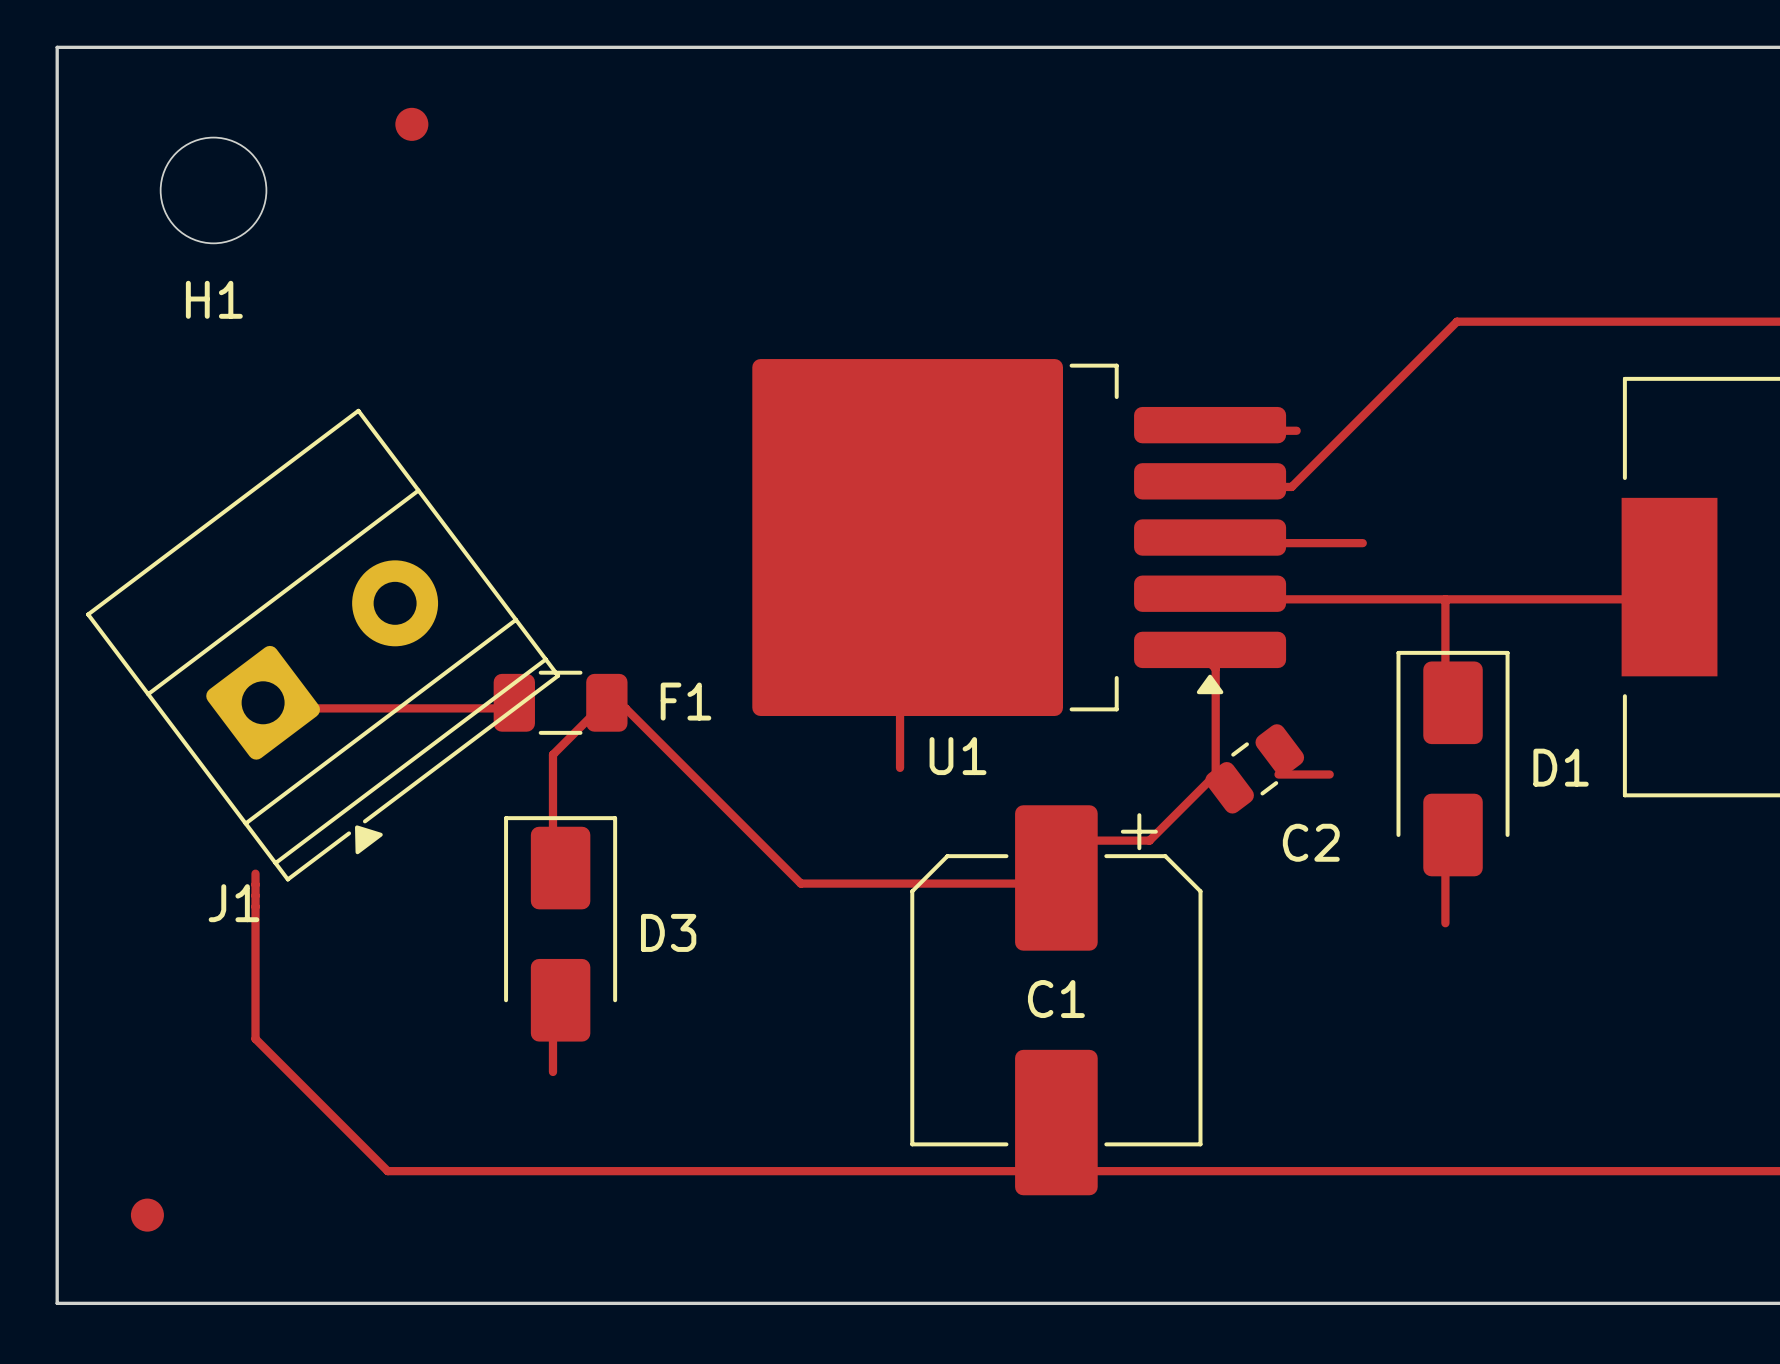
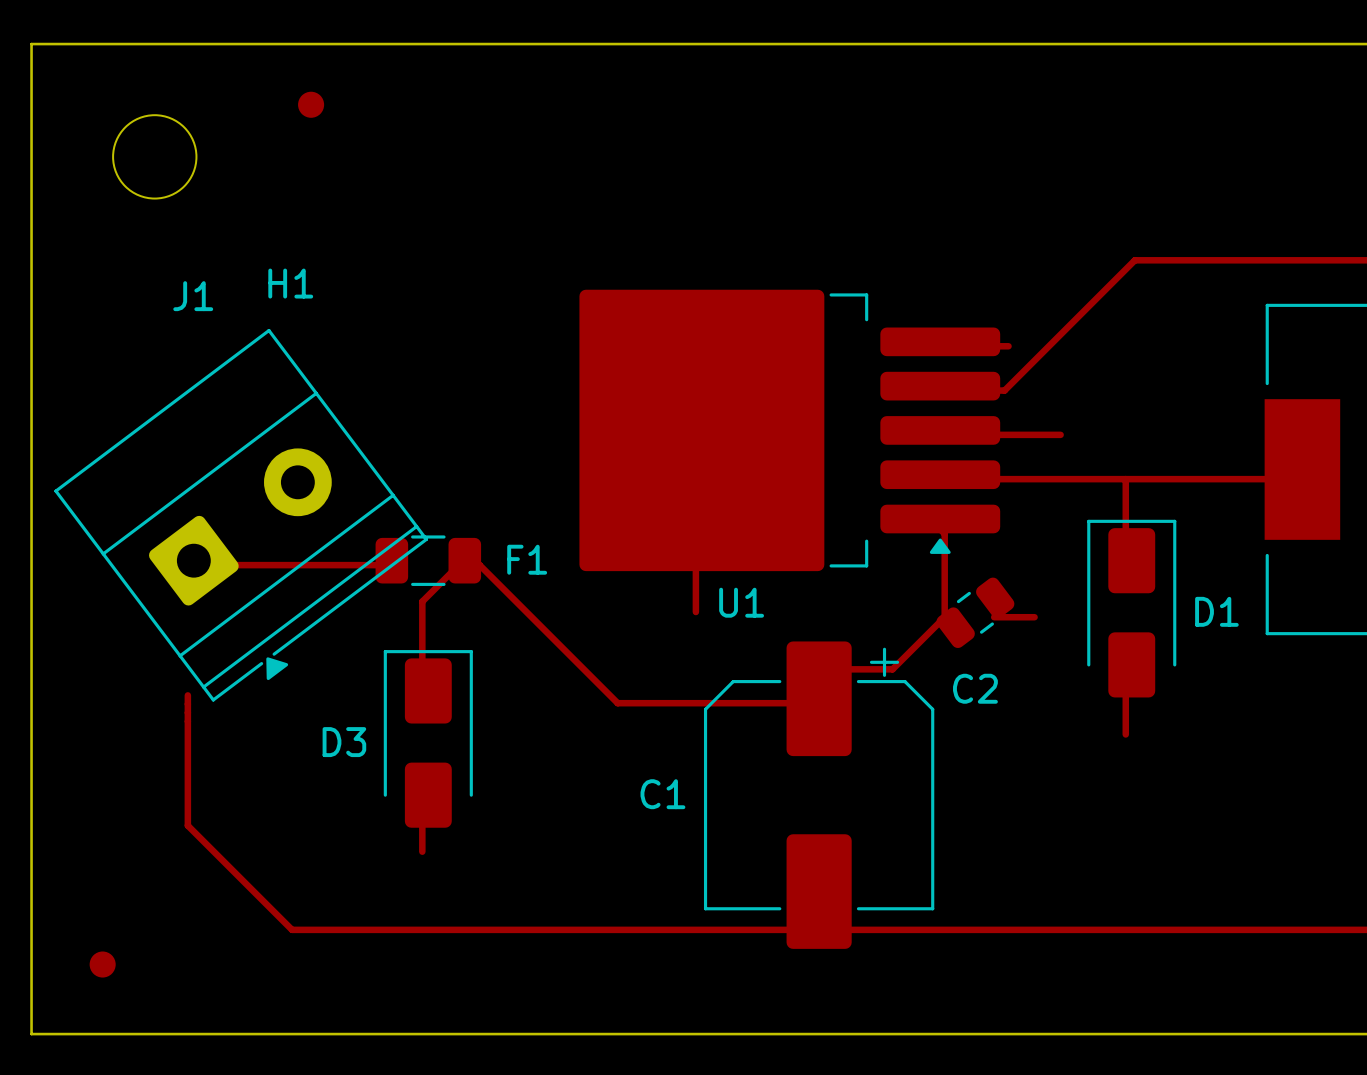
H1 name position: H1 (214, 299) -> H1 (290, 283)
C2 name position: C2 (1311, 842) -> C2 (975, 688)
J1 name position: J1 (233, 903) -> J1 (193, 296)
D3 name position: D3 (668, 932) -> D3 (344, 742)
C1 name position: C1 (1056, 999) -> C1 (662, 794)

